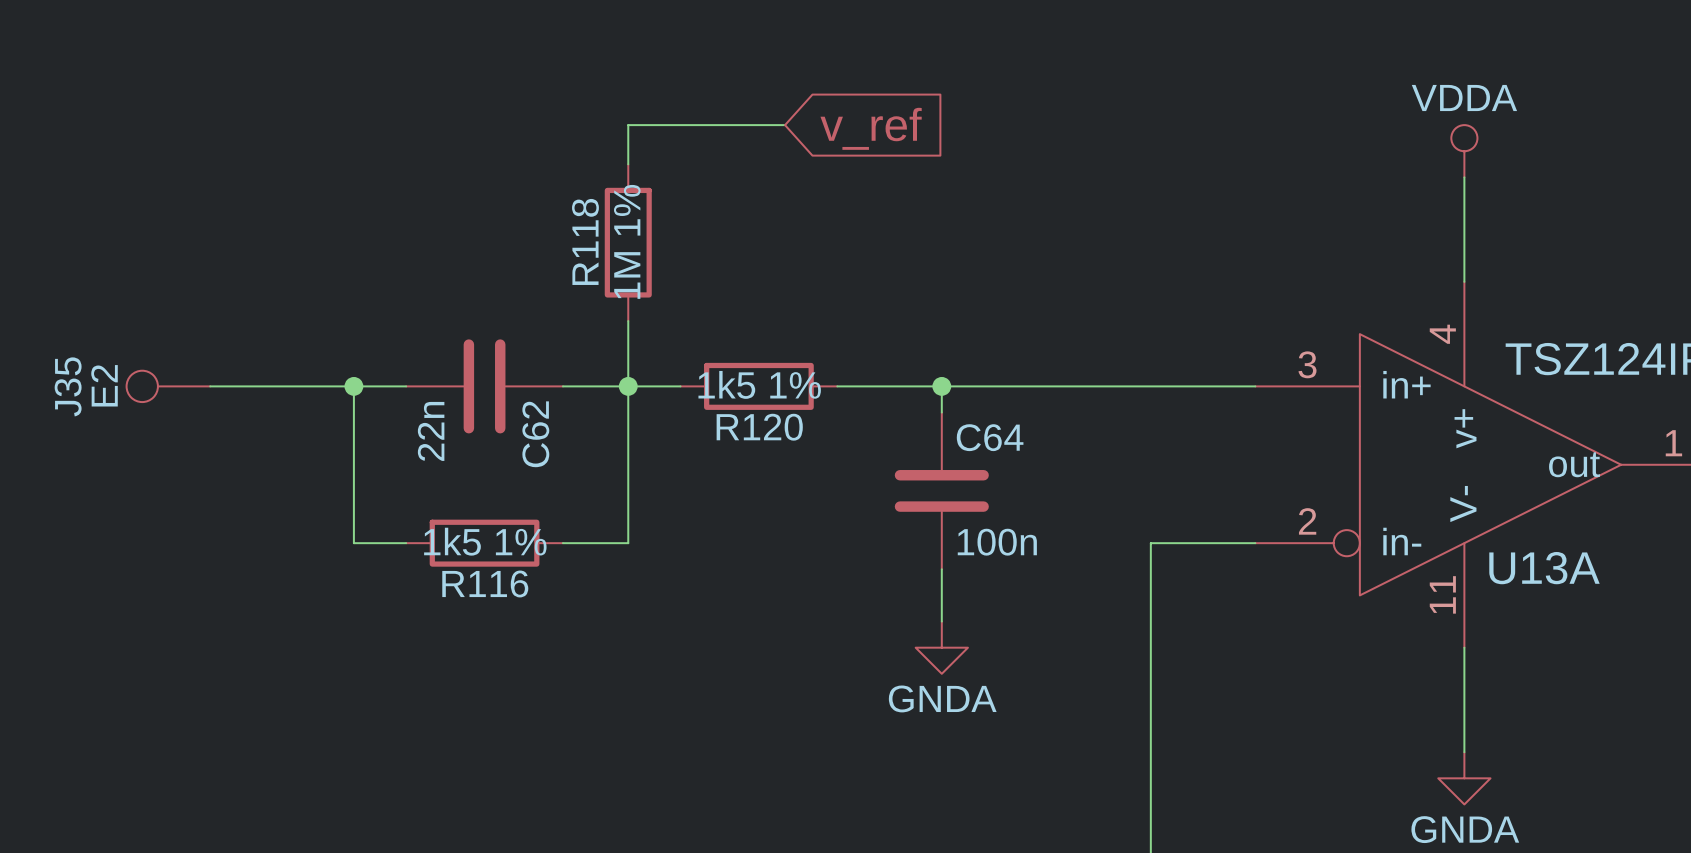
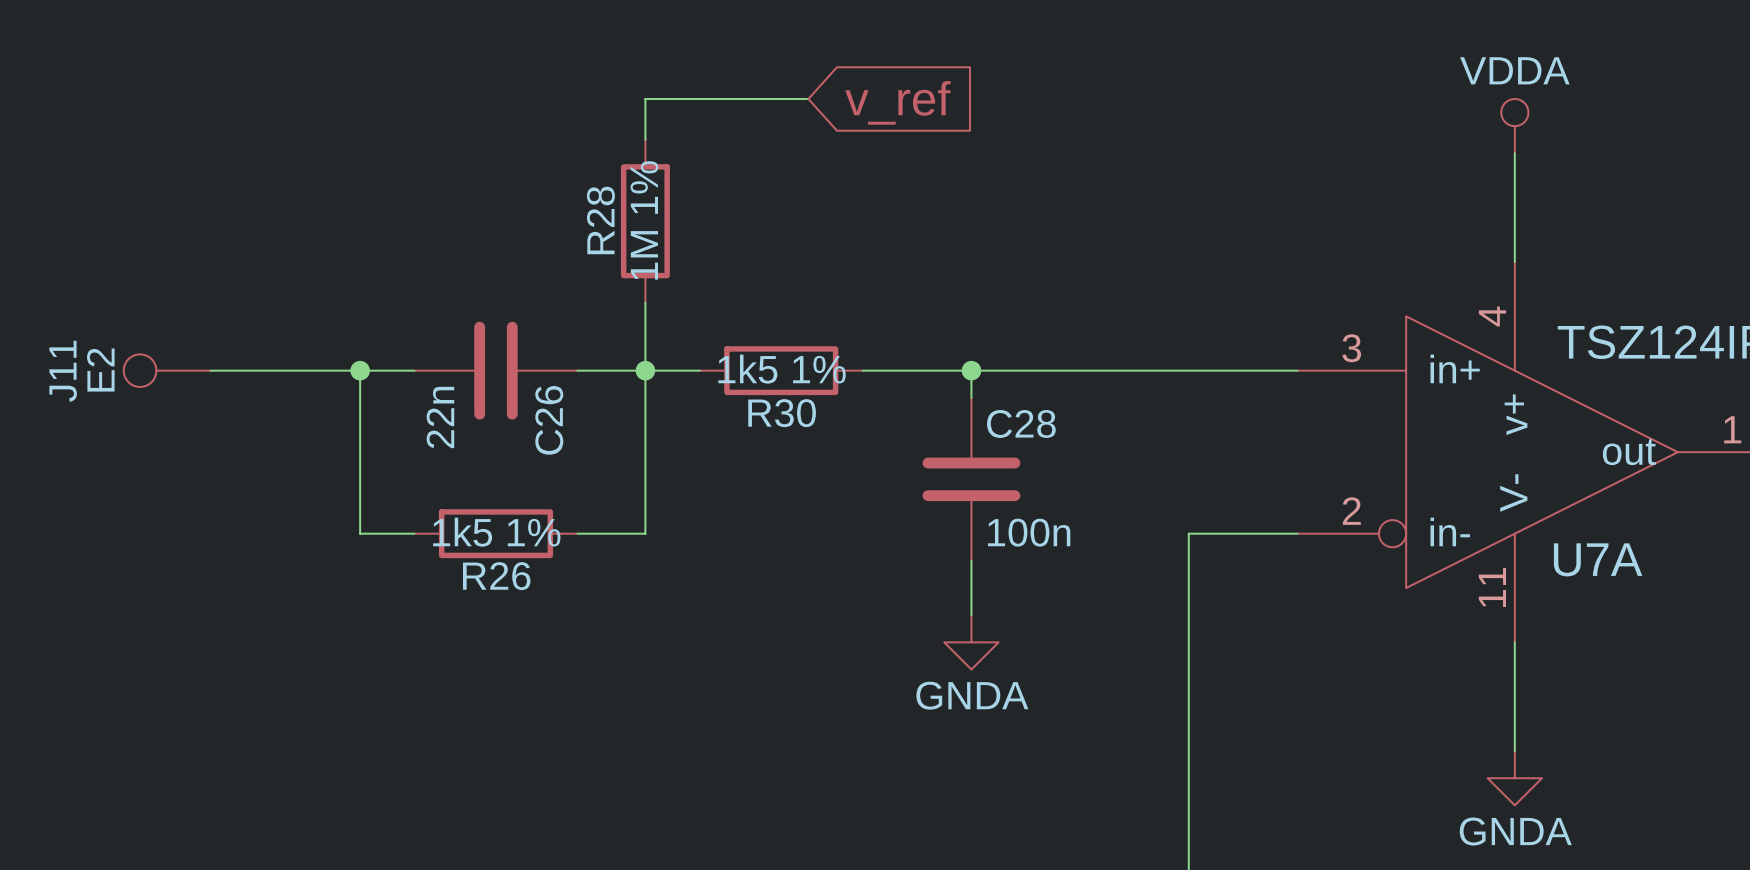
R118 name: R118 (585, 241) -> R28 (600, 220)
J35 name: J35 (68, 386) -> J11 (63, 371)
R120 name: R120 (759, 427) -> R30 (782, 413)
C62 name: C62 (535, 434) -> C26 (549, 420)
C64 name: C64 (990, 437) -> C28 (1021, 423)
U13A name: U13A (1544, 568) -> U7A (1598, 559)
R116 name: R116 (485, 583) -> R26 (496, 576)

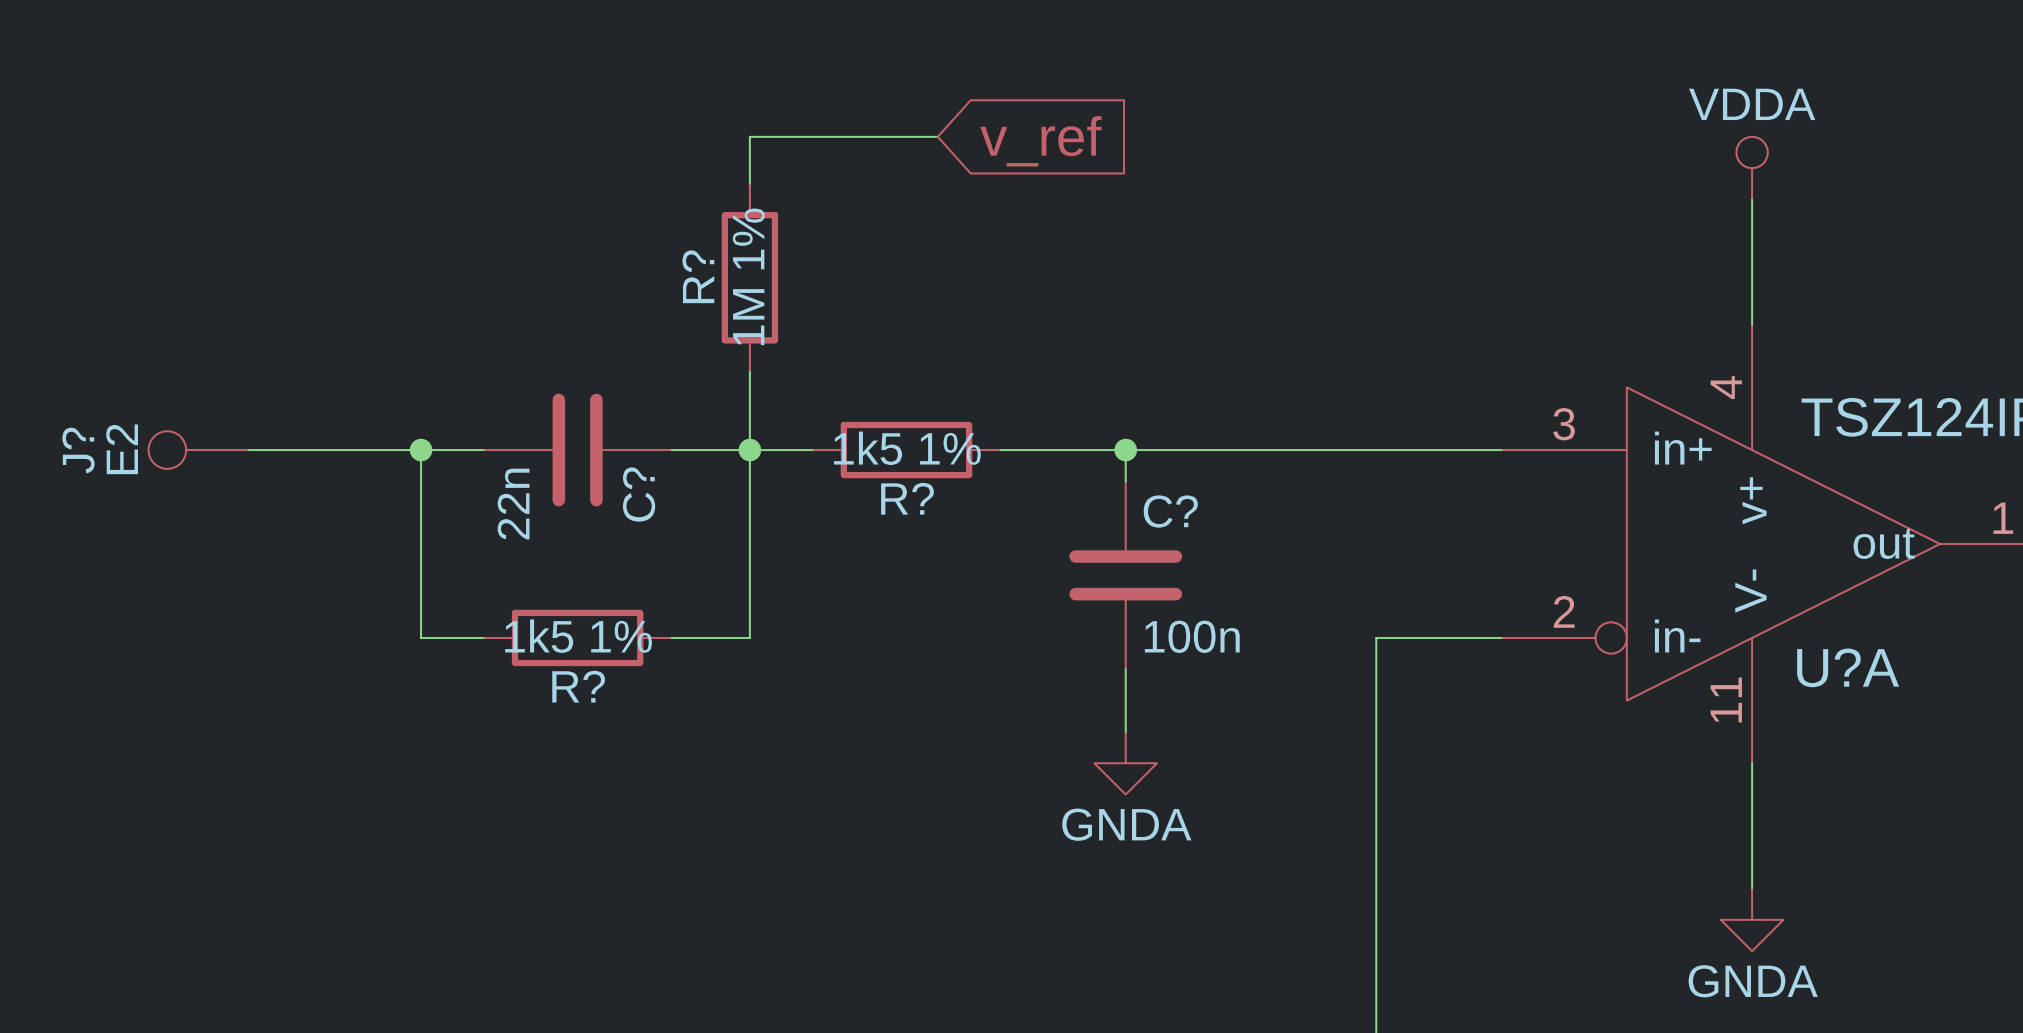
R28 name: R28 (600, 220) -> R? (698, 276)
J11 name: J11 (63, 371) -> J? (78, 450)
R30 name: R30 (782, 413) -> R? (907, 498)
C26 name: C26 (549, 420) -> C? (639, 494)
C28 name: C28 (1021, 423) -> C? (1170, 511)
U7A name: U7A (1598, 559) -> U?A (1848, 667)
R26 name: R26 (496, 576) -> R? (578, 686)

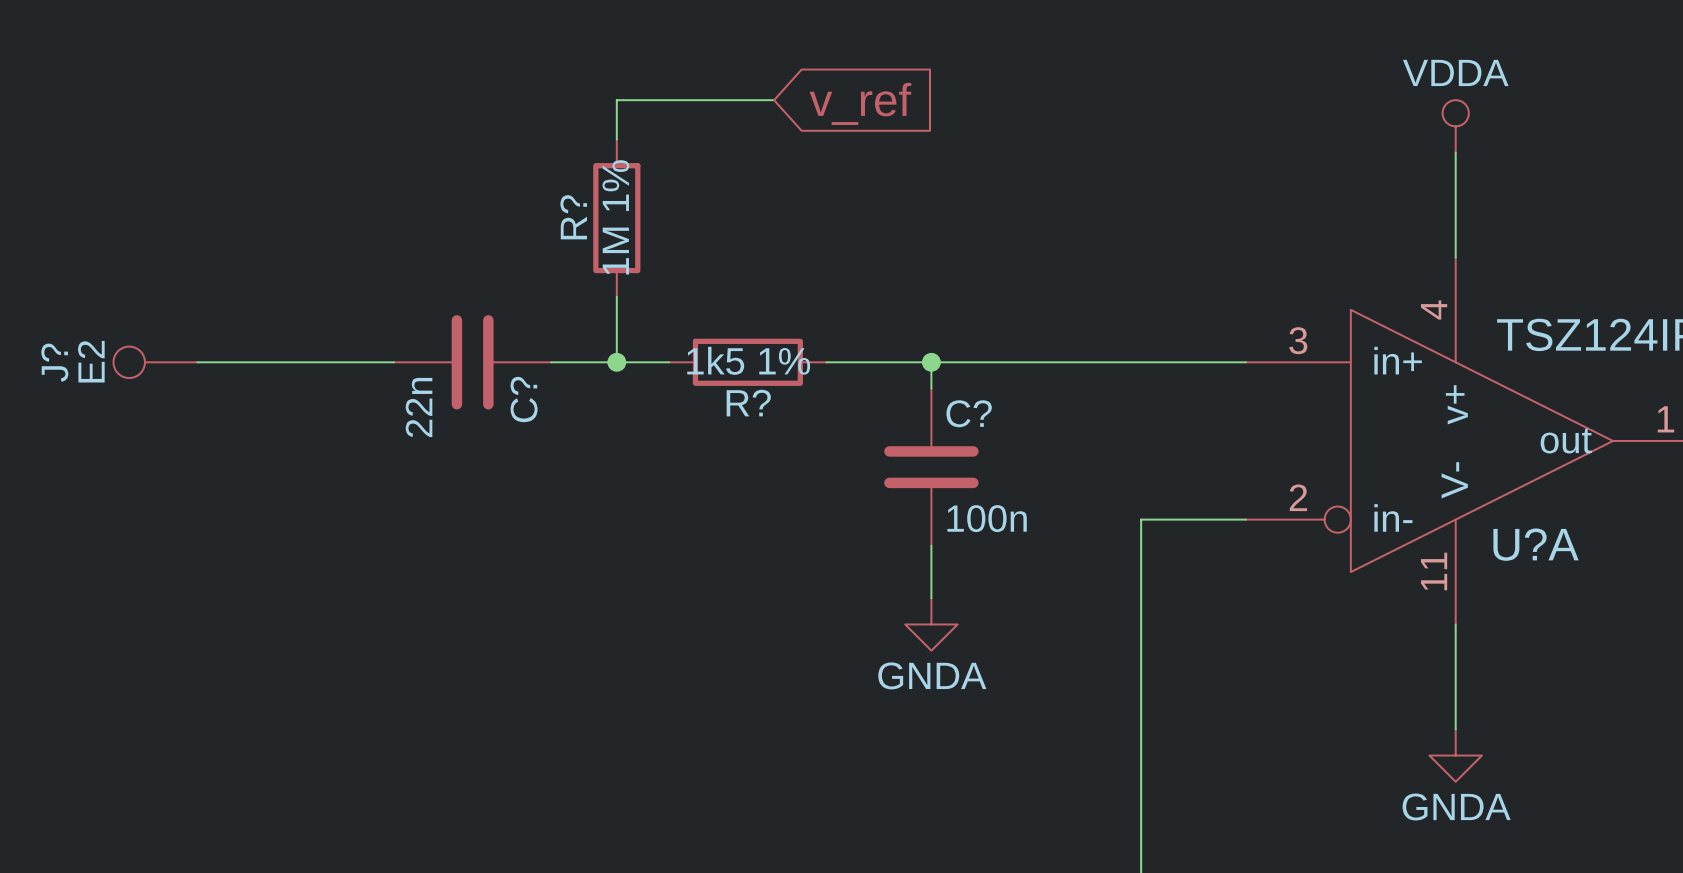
wire: (421, 450) (421, 637) (483, 637) -> none
junction: (421, 450) -> none
wire: (749, 450) (749, 637) (671, 637) -> none
R?: 1k5 1% (577, 637) -> none

